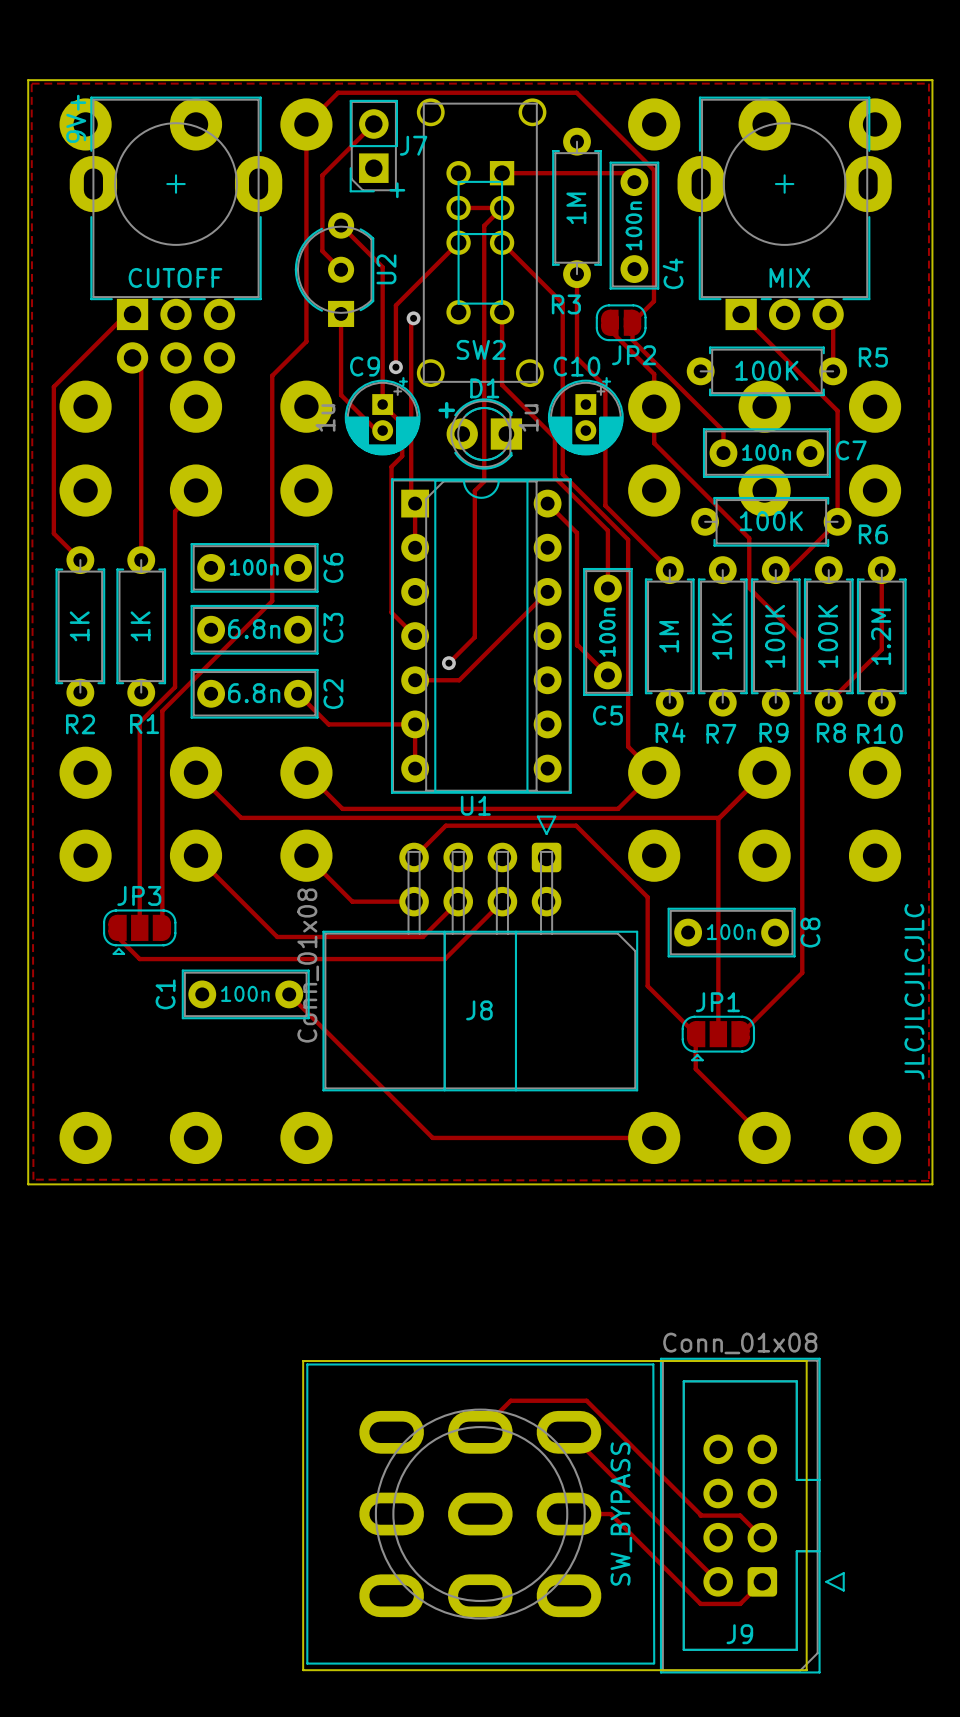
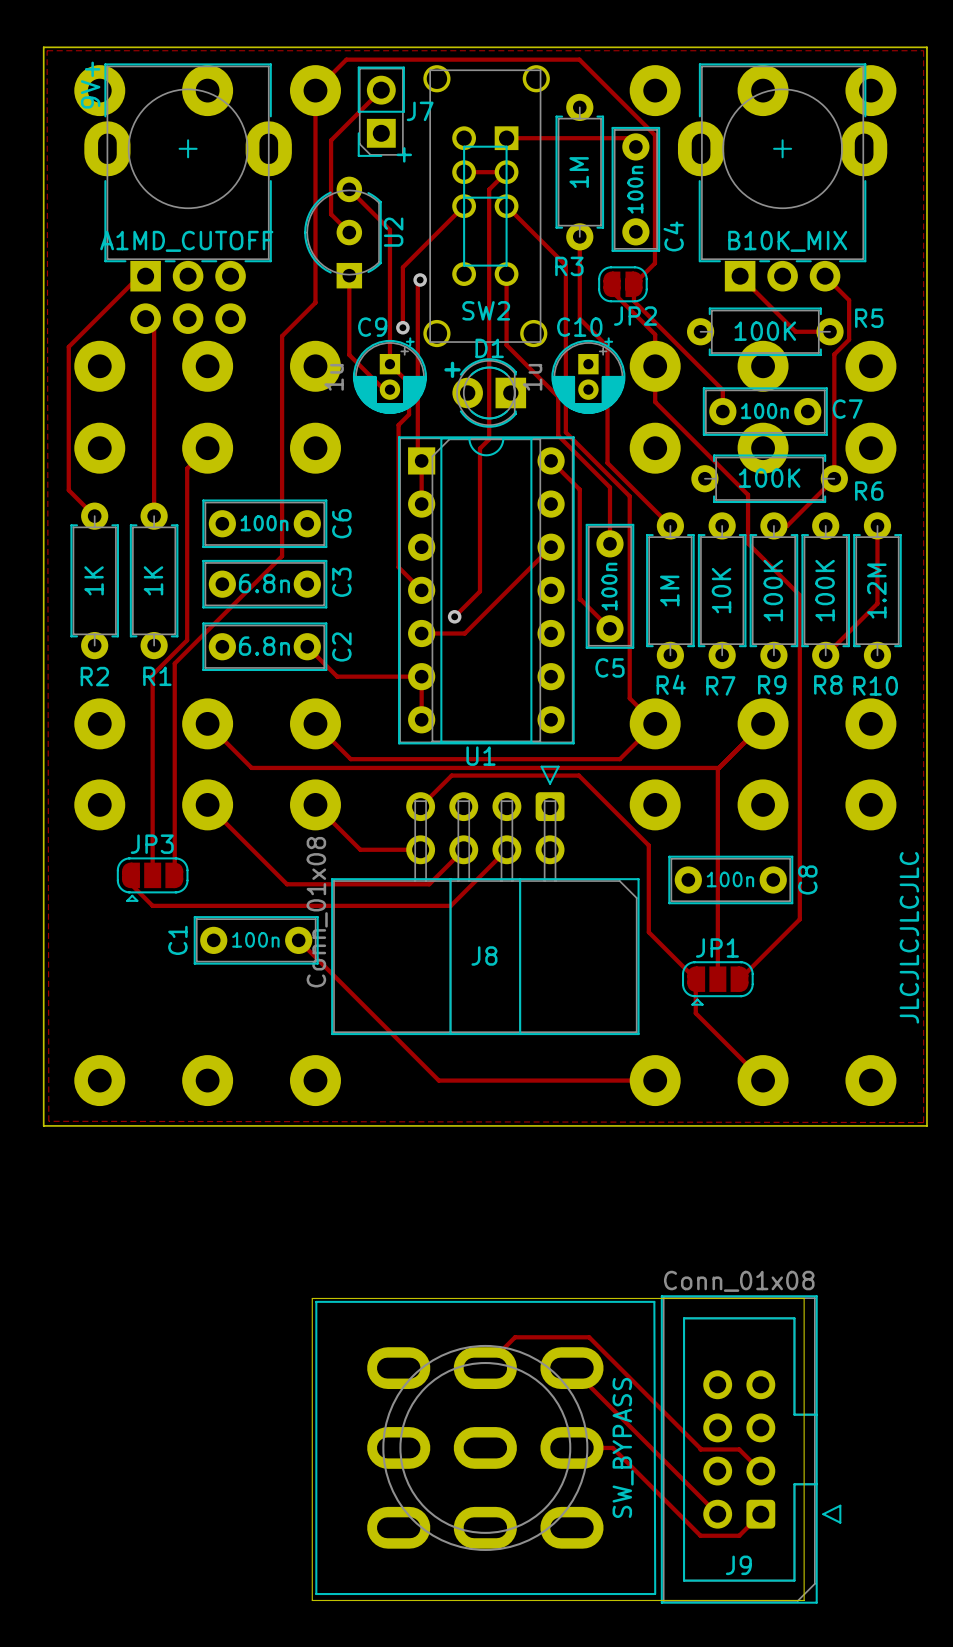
part value: CUTOFF (175, 277) -> A1MD_CUTOFF (186, 241)
part value: MIX (789, 277) -> B10K_MIX (787, 241)
track: none -> (825, 276) (849, 300) (849, 339) (834, 354) (834, 370)
track: (833, 319) (833, 371) -> none
track: (798, 371) (837, 410) -> (795, 331) (830, 331)

